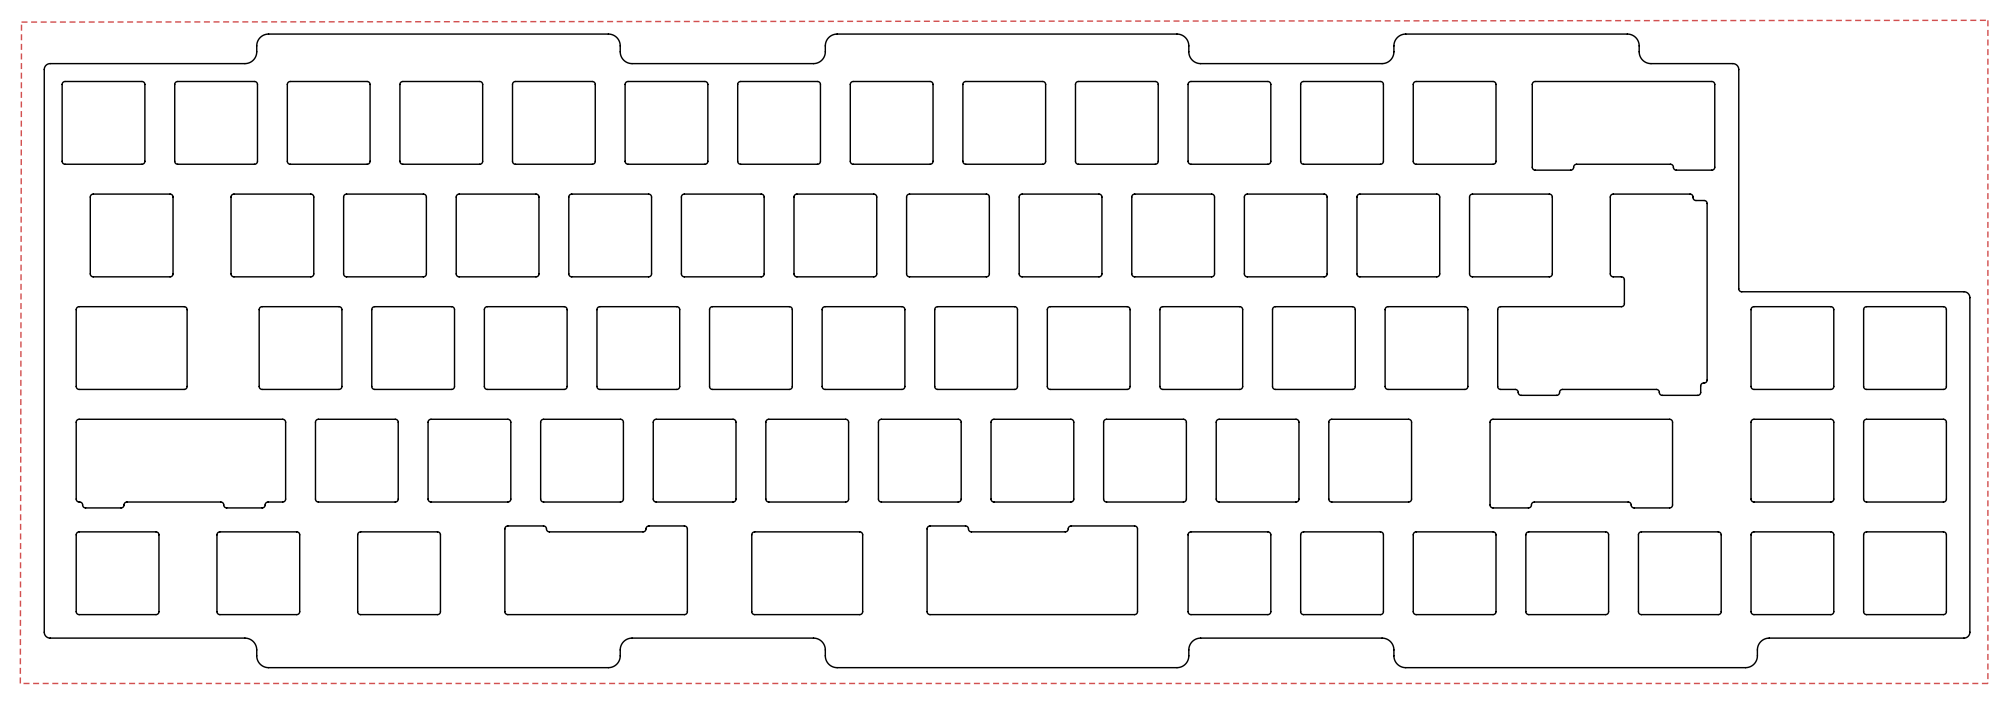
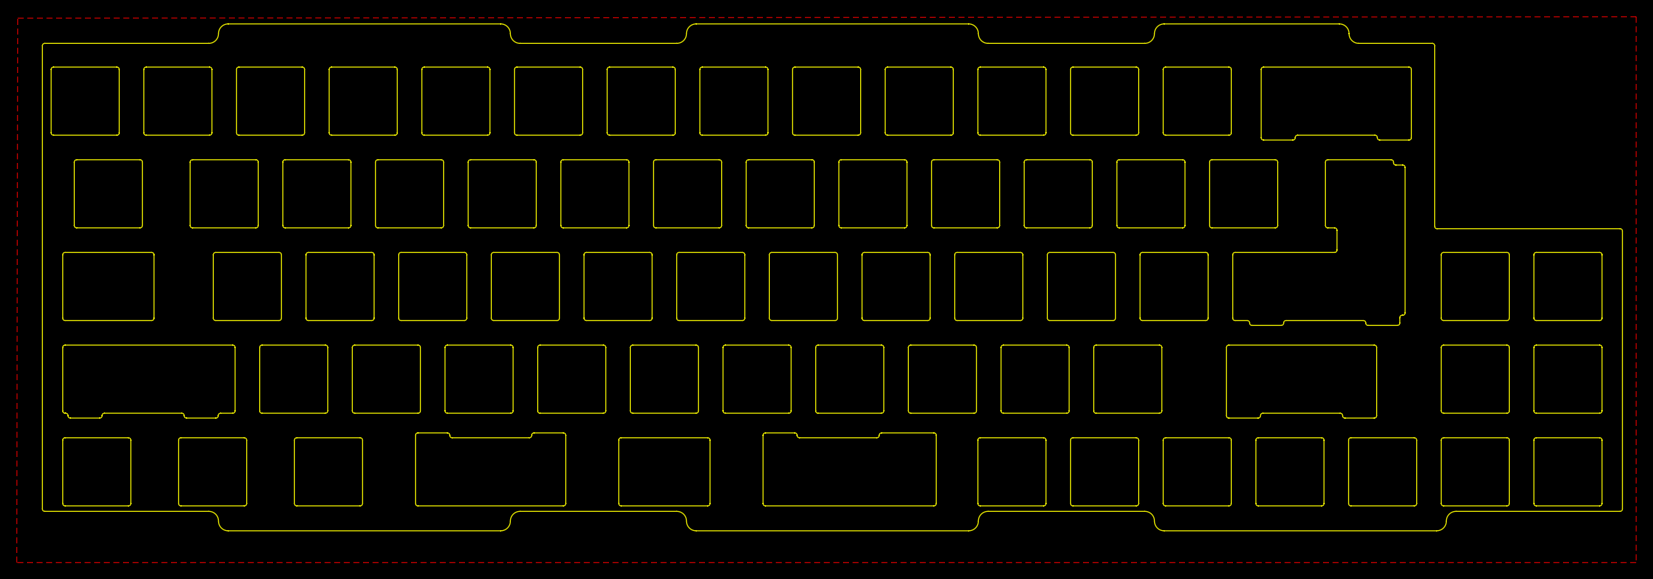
board edge: (268, 34) (609, 34) (619, 40) (622, 59) (632, 63) (814, 63) (824, 56) (827, 38) (837, 34) (1178, 34) (1187, 40) (1191, 59) (1200, 63) (1383, 63) (1391, 59) (1395, 40) (1404, 34) (1627, 34) (1636, 38) (1640, 56) (1648, 63) (1734, 63) (1738, 69) (1739, 290) (1963, 291) (1969, 295) (1969, 634) (1963, 638) (1767, 638) (1758, 644) (1754, 663) (1745, 667) (1404, 667) (1395, 660) (1391, 642) (1382, 638) (1199, 638) (1189, 644) (1186, 663) (1176, 667) (835, 667) (826, 660) (822, 642) (813, 638) (630, 638) (621, 644) (617, 663) (608, 667) (268, 667) (259, 663) (255, 644) (246, 638) (48, 637) (44, 632) (44, 67) (50, 63) (246, 63) (255, 56) (259, 38) (268, 34) -> (228, 23) (221, 26) (217, 38) (209, 43) (42, 44) (43, 511) (209, 511) (217, 515) (221, 527) (228, 530) (501, 530) (508, 526) (513, 514) (520, 511) (677, 511) (684, 515) (689, 527) (696, 530) (969, 530) (976, 526) (981, 514) (988, 511) (1145, 511) (1152, 515) (1157, 527) (1164, 530) (1436, 530) (1443, 527) (1447, 515) (1454, 511) (1622, 509) (1622, 230) (1435, 227) (1433, 43) (1356, 43) (1350, 38) (1346, 26) (1339, 23) (1163, 23) (1155, 28) (1151, 40) (1144, 43) (987, 43) (979, 38) (975, 26) (968, 23) (695, 23) (687, 28) (683, 40) (676, 43) (519, 43) (511, 38) (507, 26) (500, 23) (228, 23)

